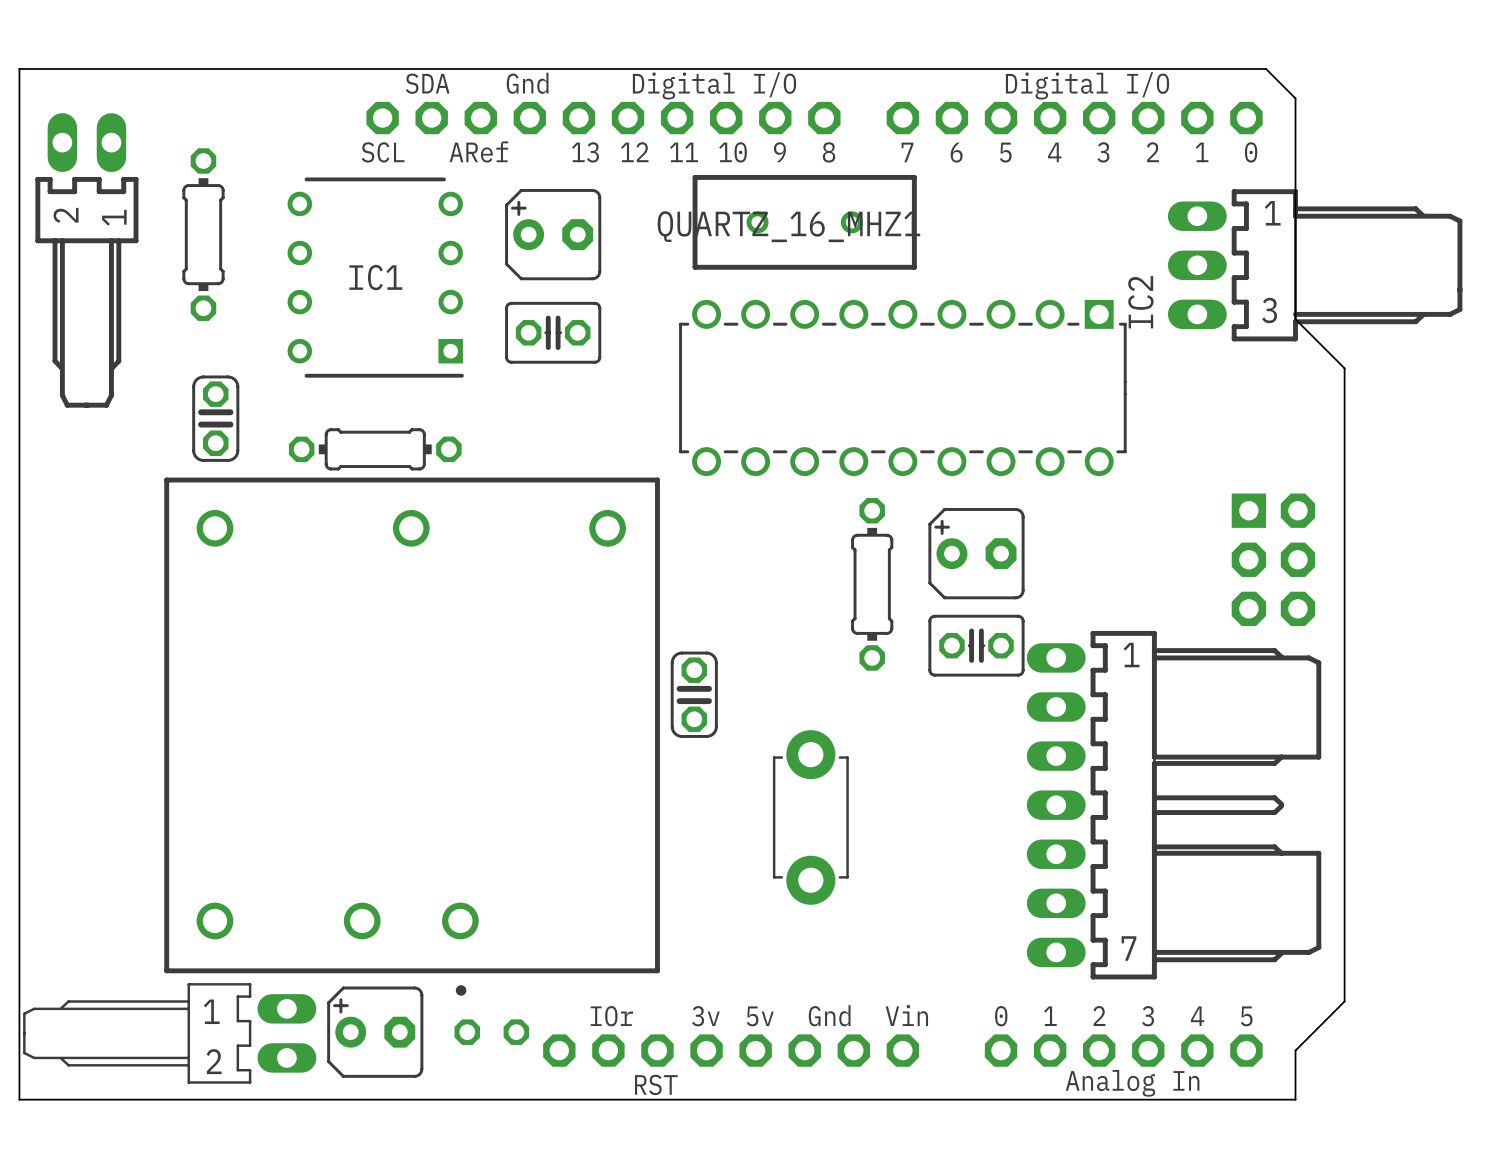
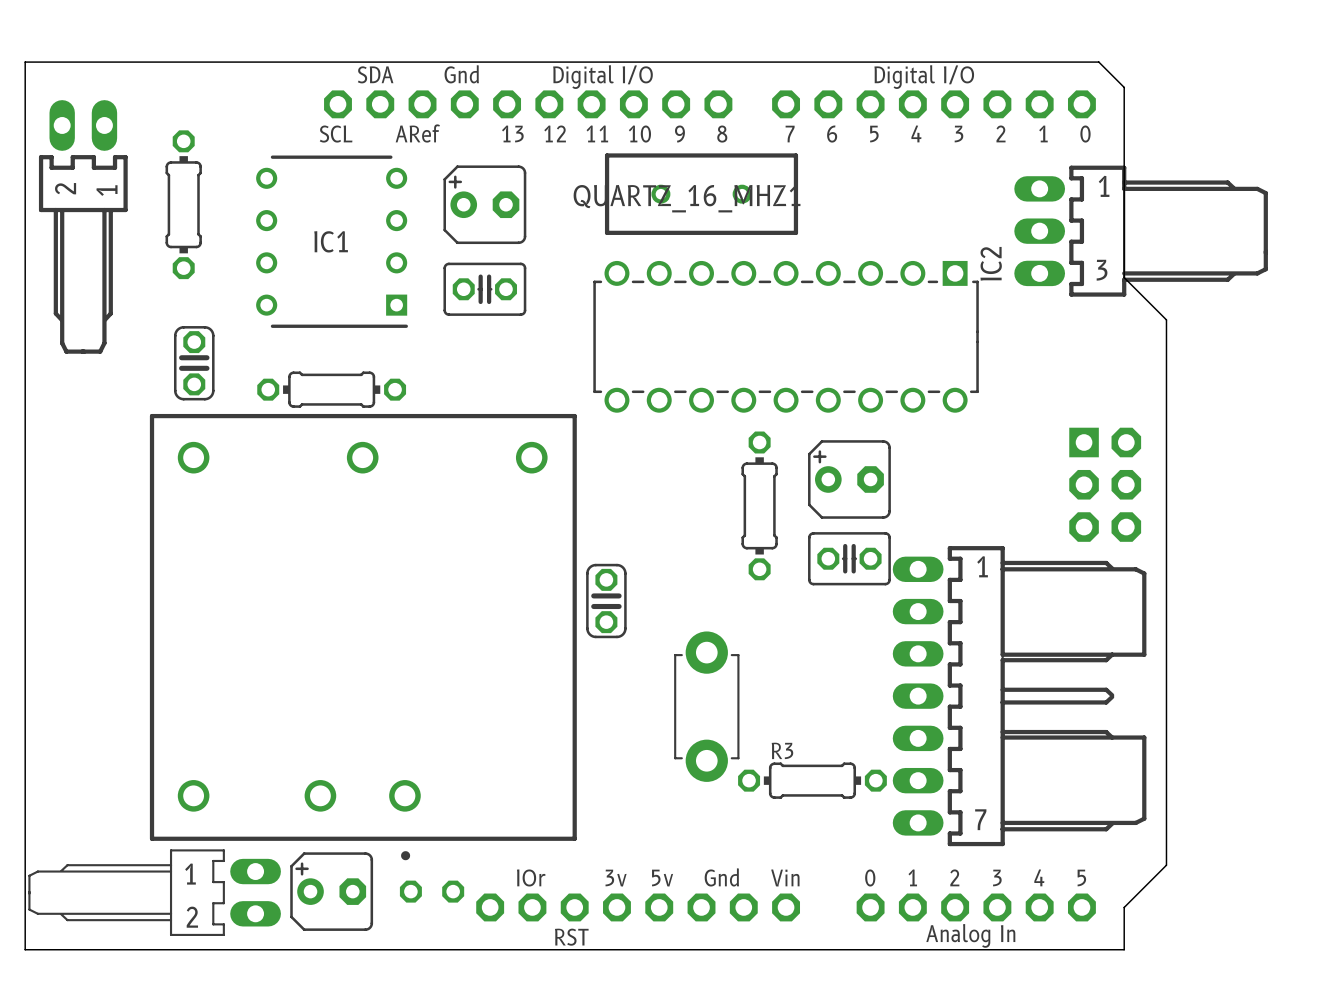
R3: none -> (812, 780)

